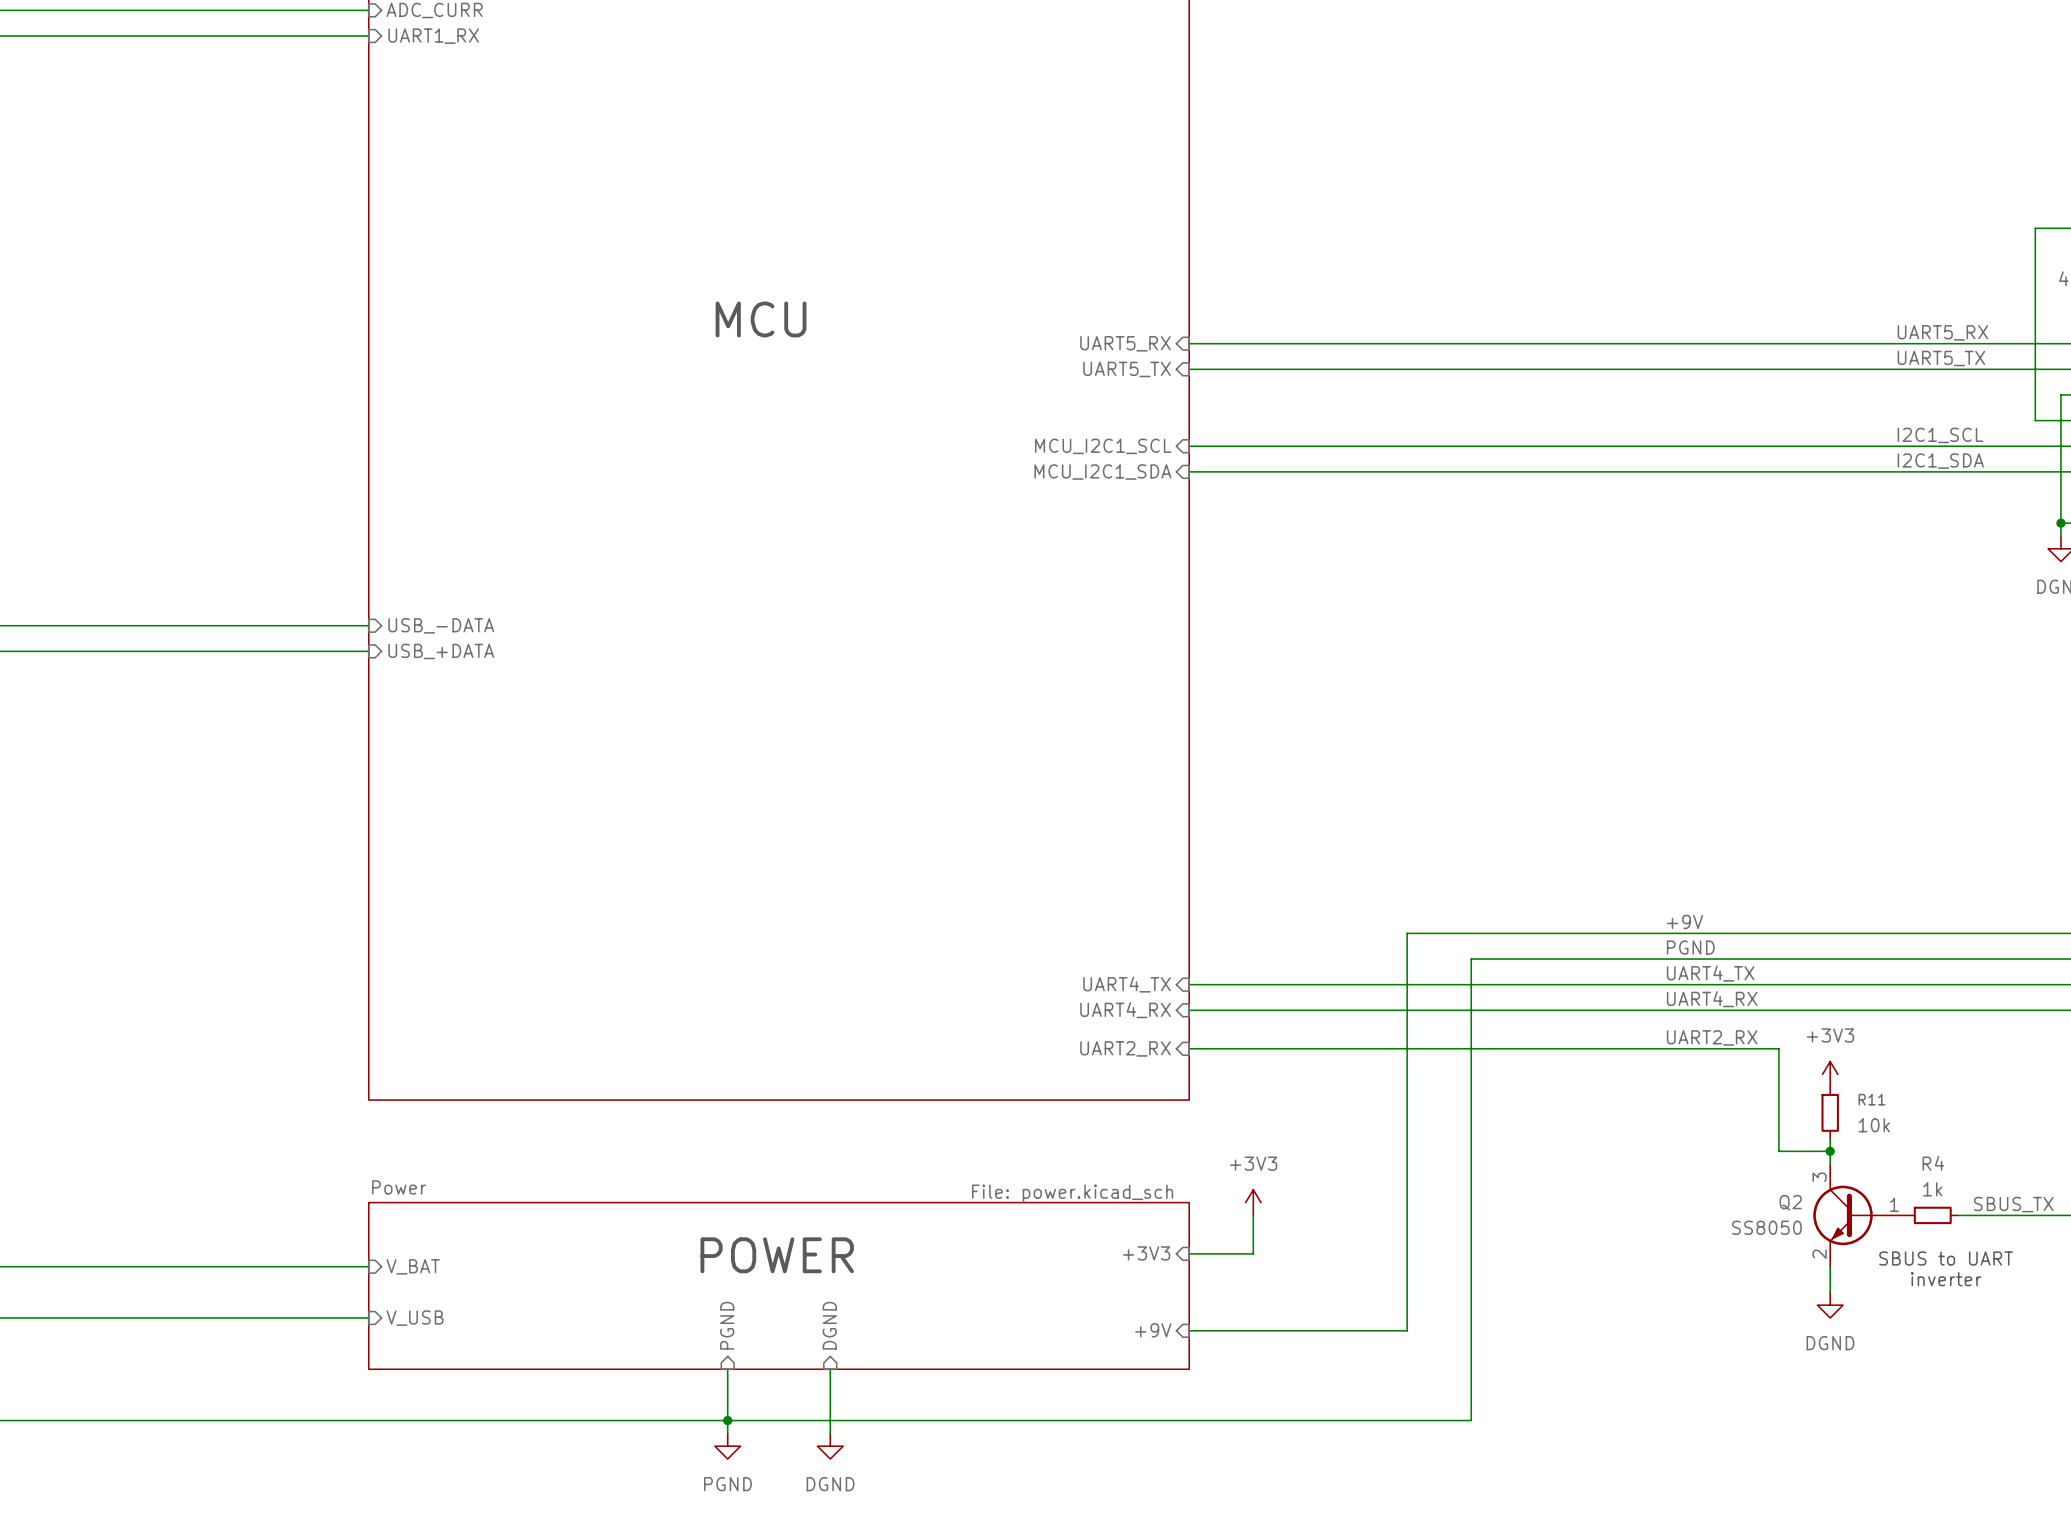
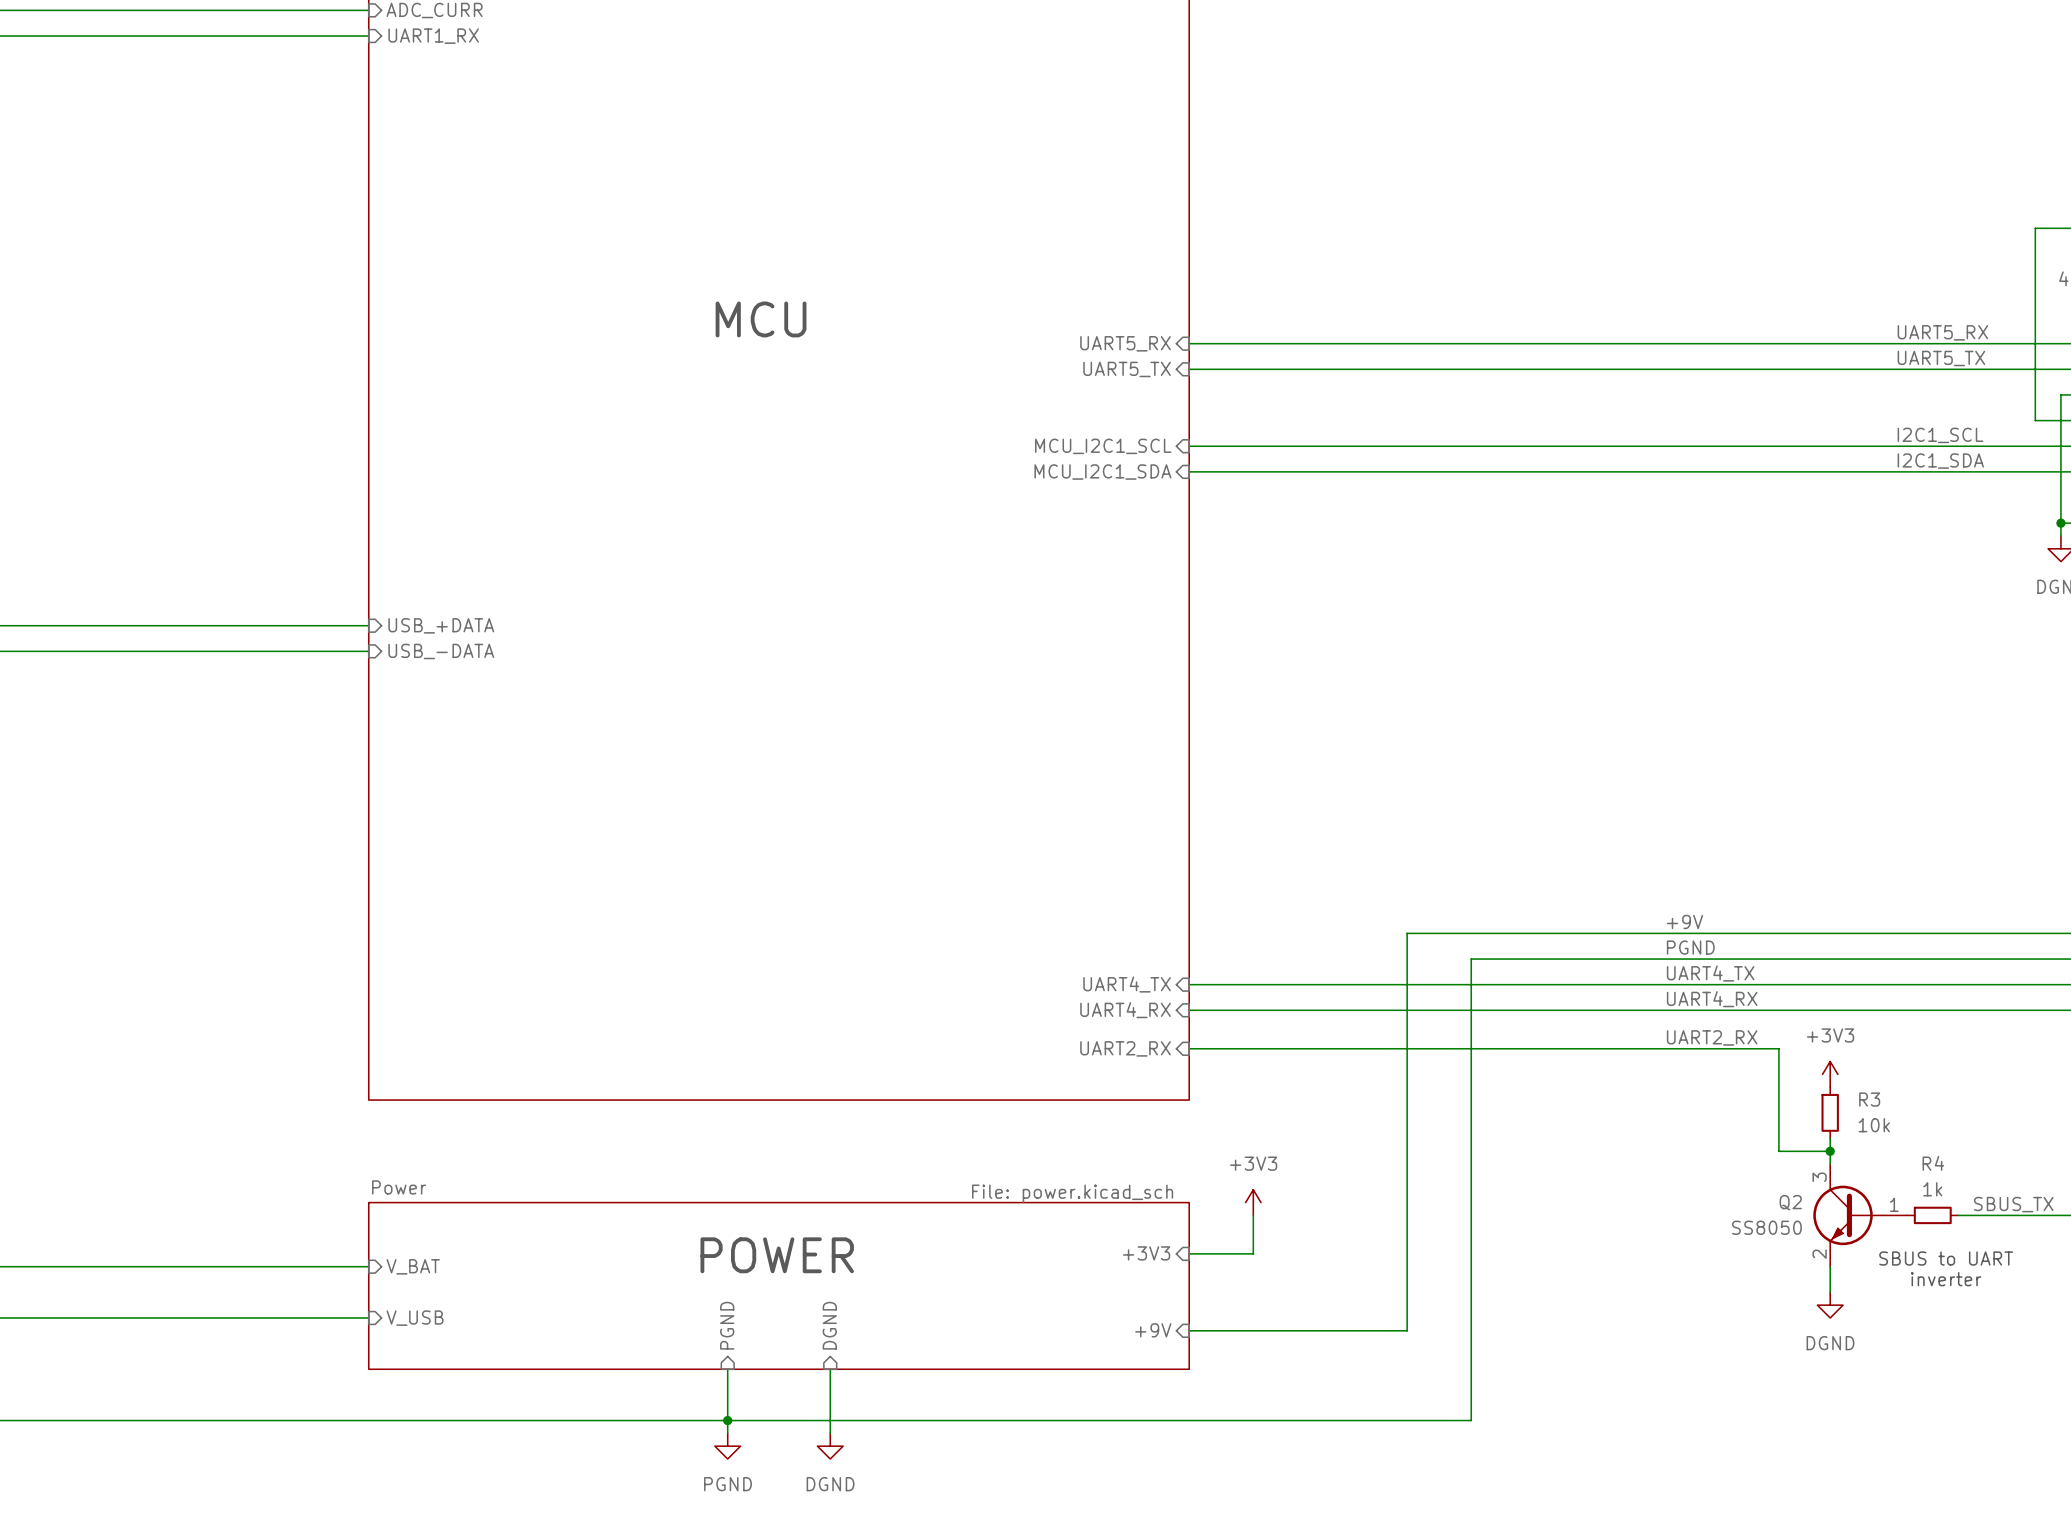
sheet pin: USB_-DATA (441, 625) -> USB_+DATA (441, 625)
sheet pin: USB_+DATA (441, 651) -> USB_-DATA (441, 651)
R11 name: R11 (1871, 1099) -> R3 (1869, 1099)

